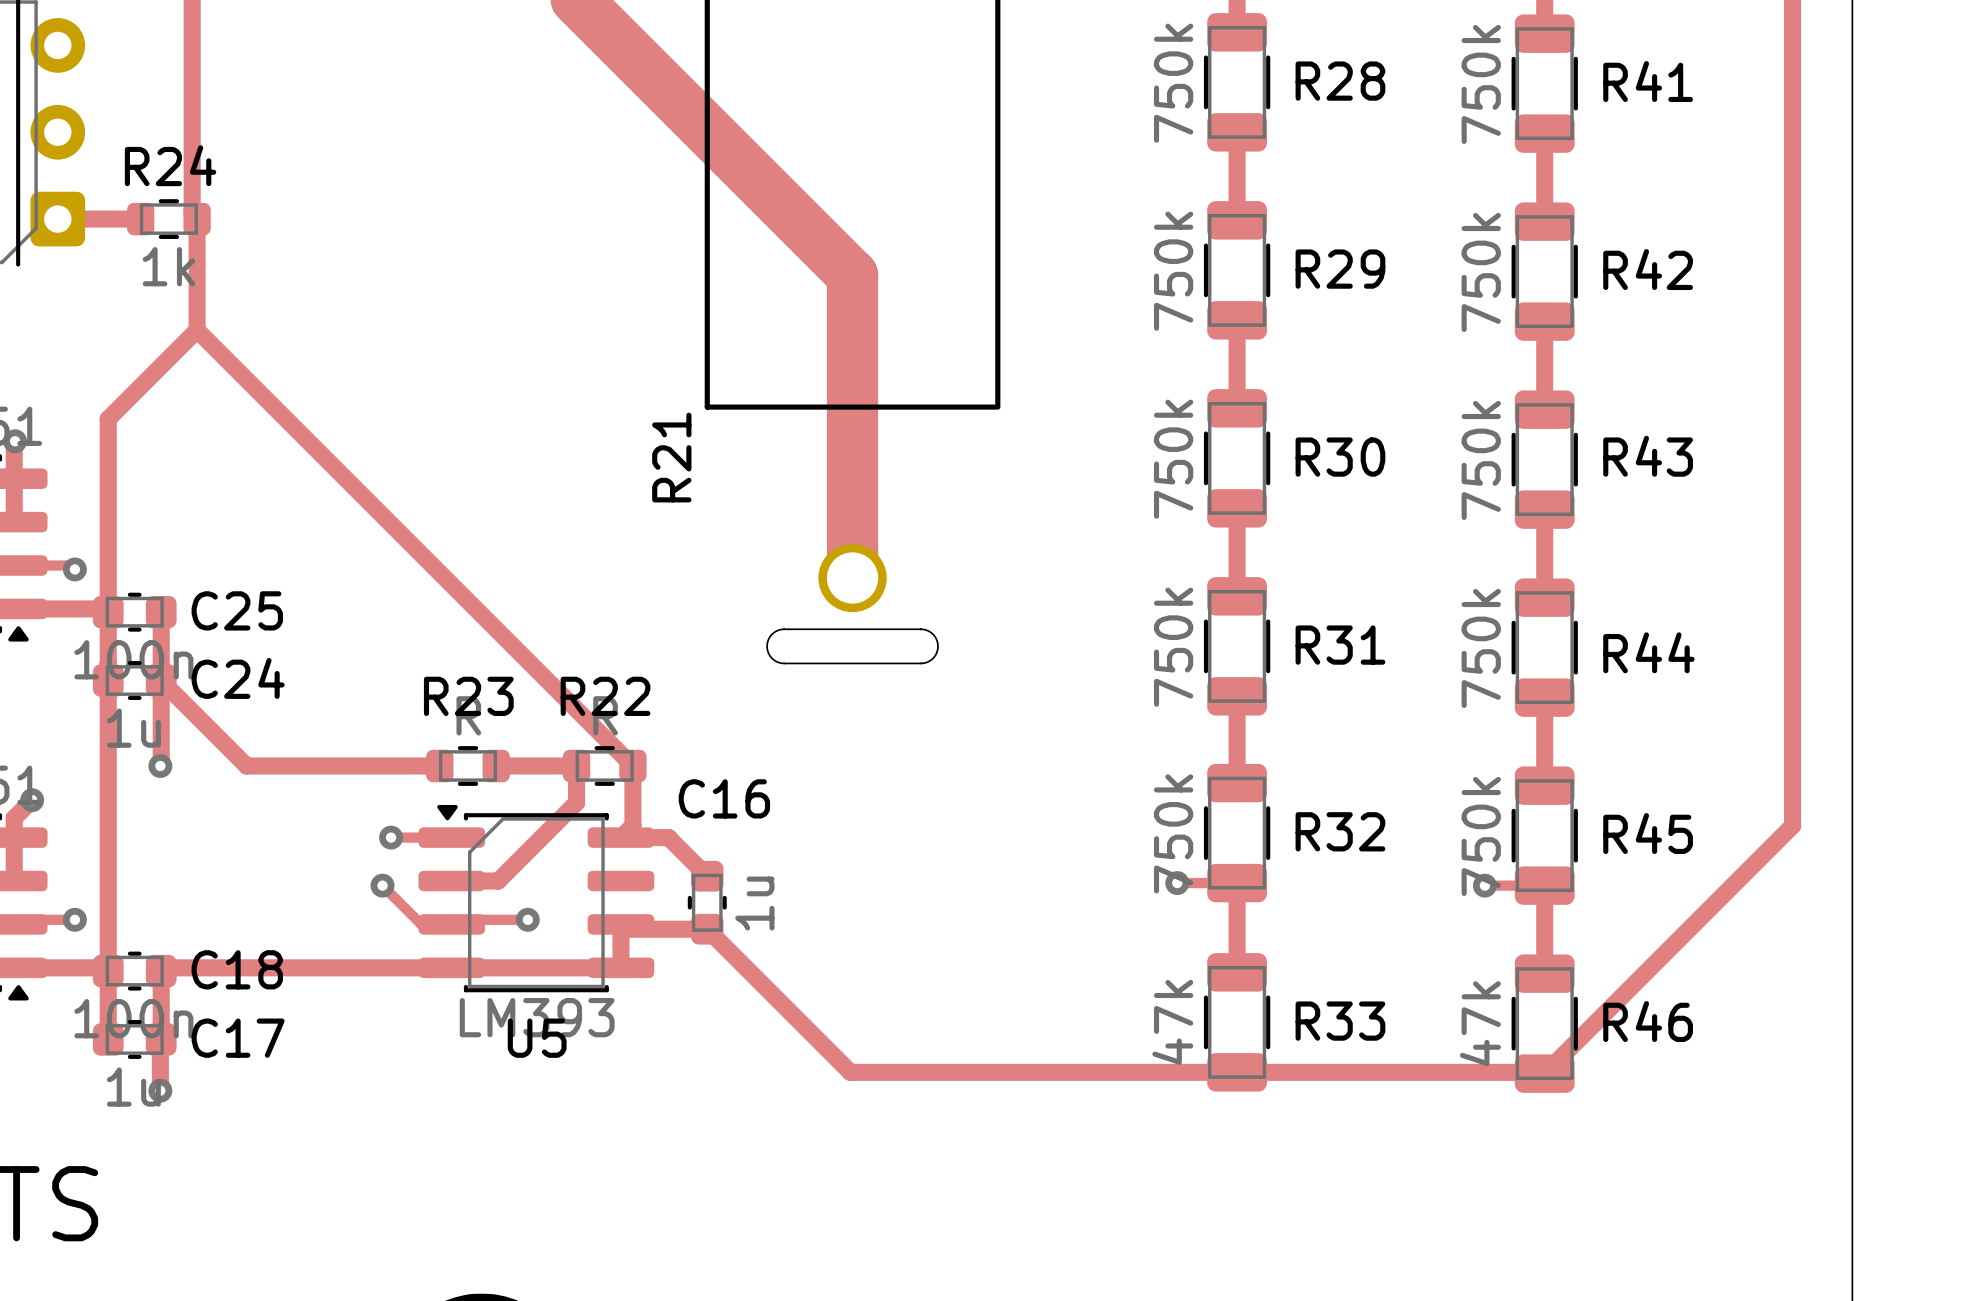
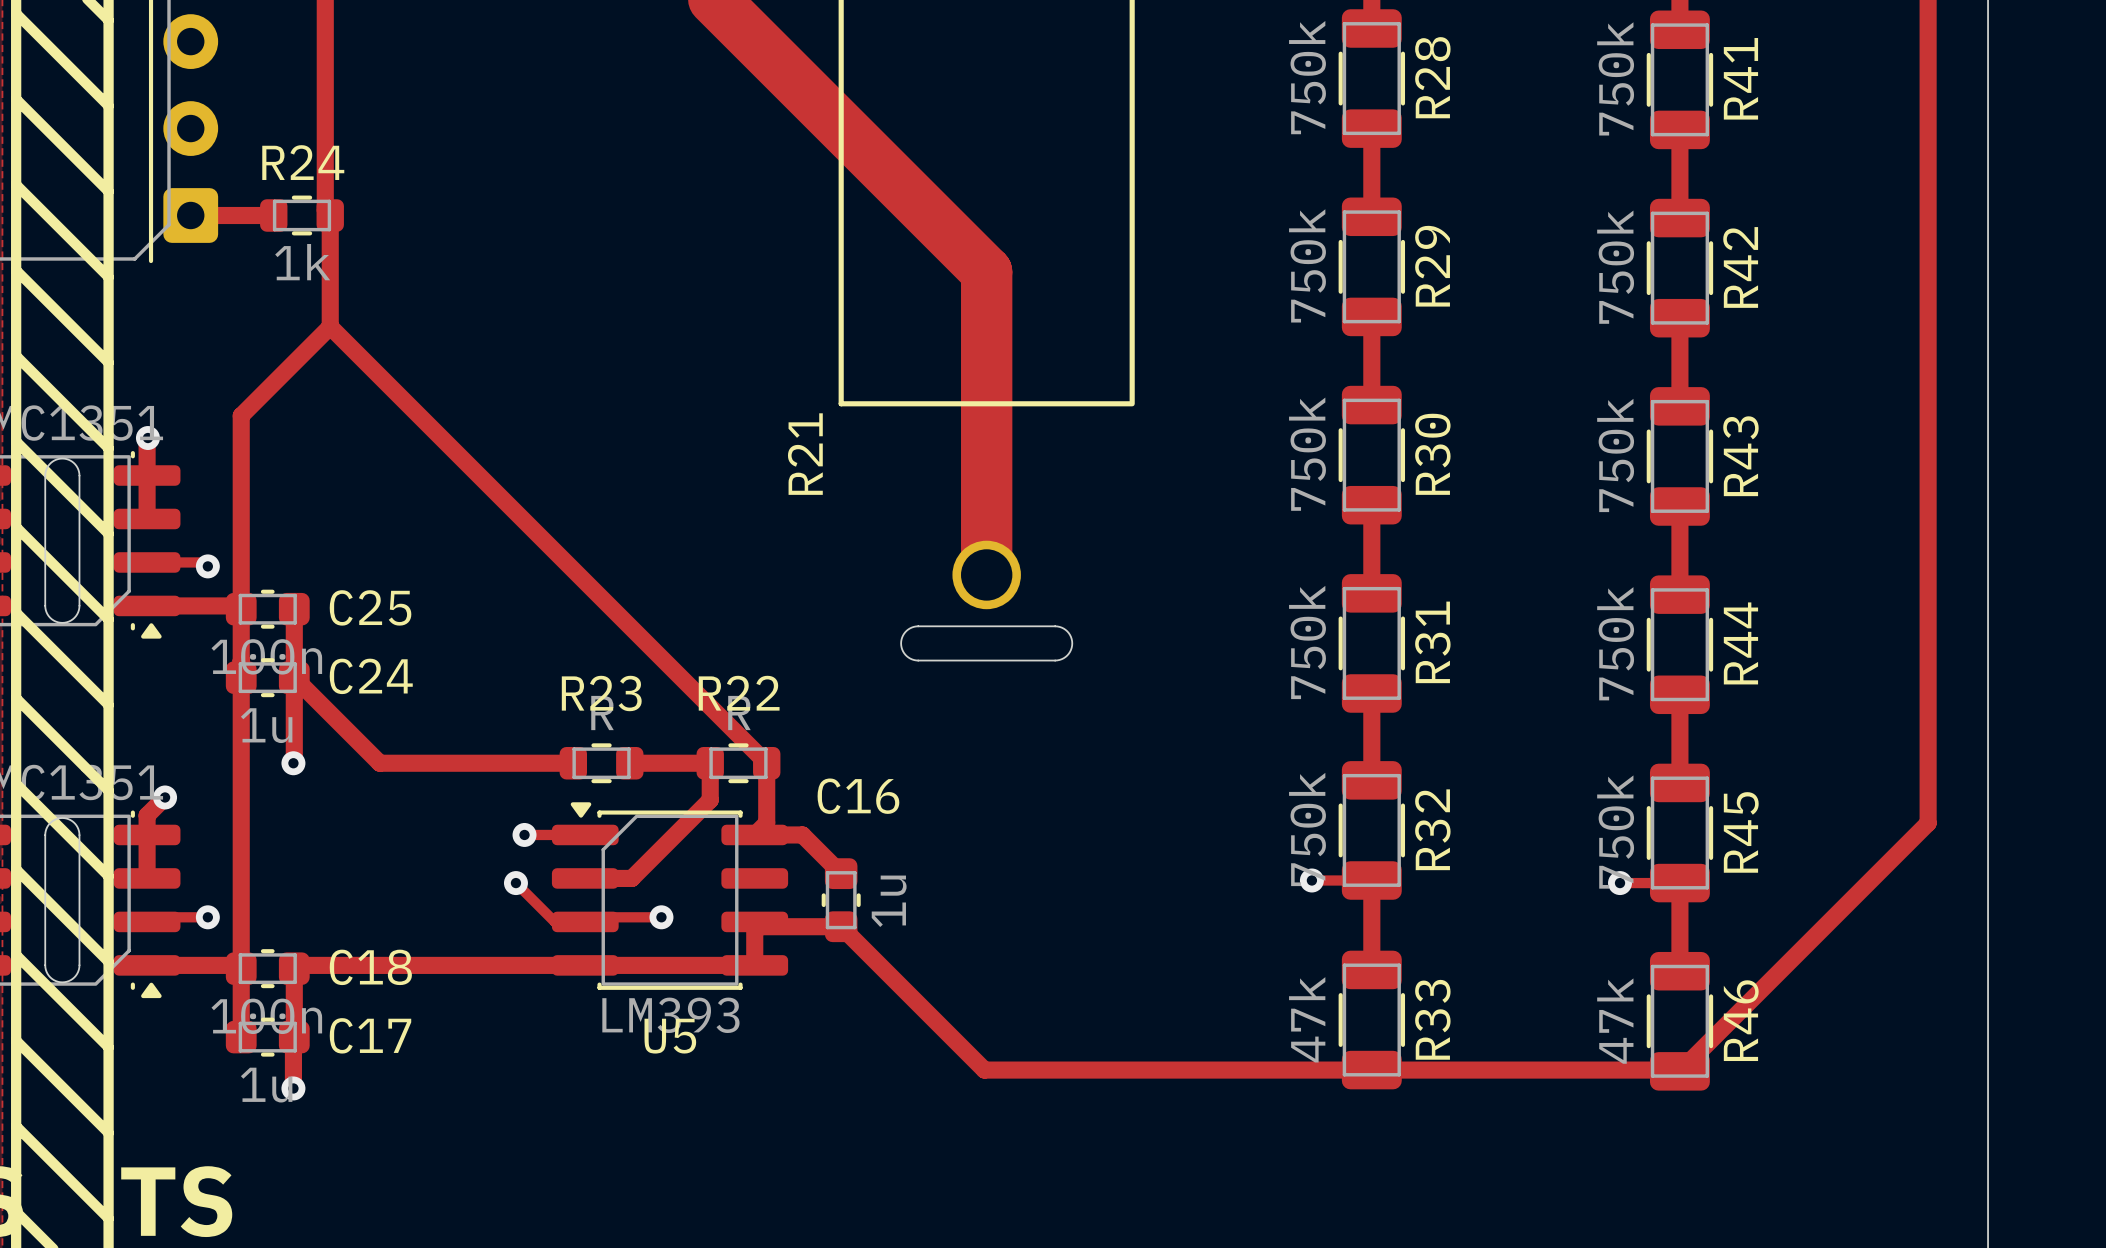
R28 name rotation: 0° (1340, 81) -> 90° counterclockwise (1432, 77)
R41 name rotation: 0° (1648, 81) -> 90° counterclockwise (1740, 78)
R29 name rotation: 0° (1340, 269) -> 90° counterclockwise (1432, 266)
R42 name rotation: 0° (1648, 269) -> 90° counterclockwise (1740, 267)
R43 name rotation: 0° (1648, 456) -> 90° counterclockwise (1740, 456)
R30 name rotation: 0° (1340, 457) -> 90° counterclockwise (1432, 454)
R31 name rotation: 0° (1340, 645) -> 90° counterclockwise (1432, 642)
R44 name rotation: 0° (1648, 652) -> 90° counterclockwise (1740, 643)
R32 name rotation: 0° (1340, 831) -> 90° counterclockwise (1432, 829)
R45 name rotation: 0° (1648, 833) -> 90° counterclockwise (1741, 832)
R33 name rotation: 0° (1340, 1021) -> 90° counterclockwise (1432, 1019)
R46 name rotation: 0° (1648, 1021) -> 90° counterclockwise (1741, 1020)

